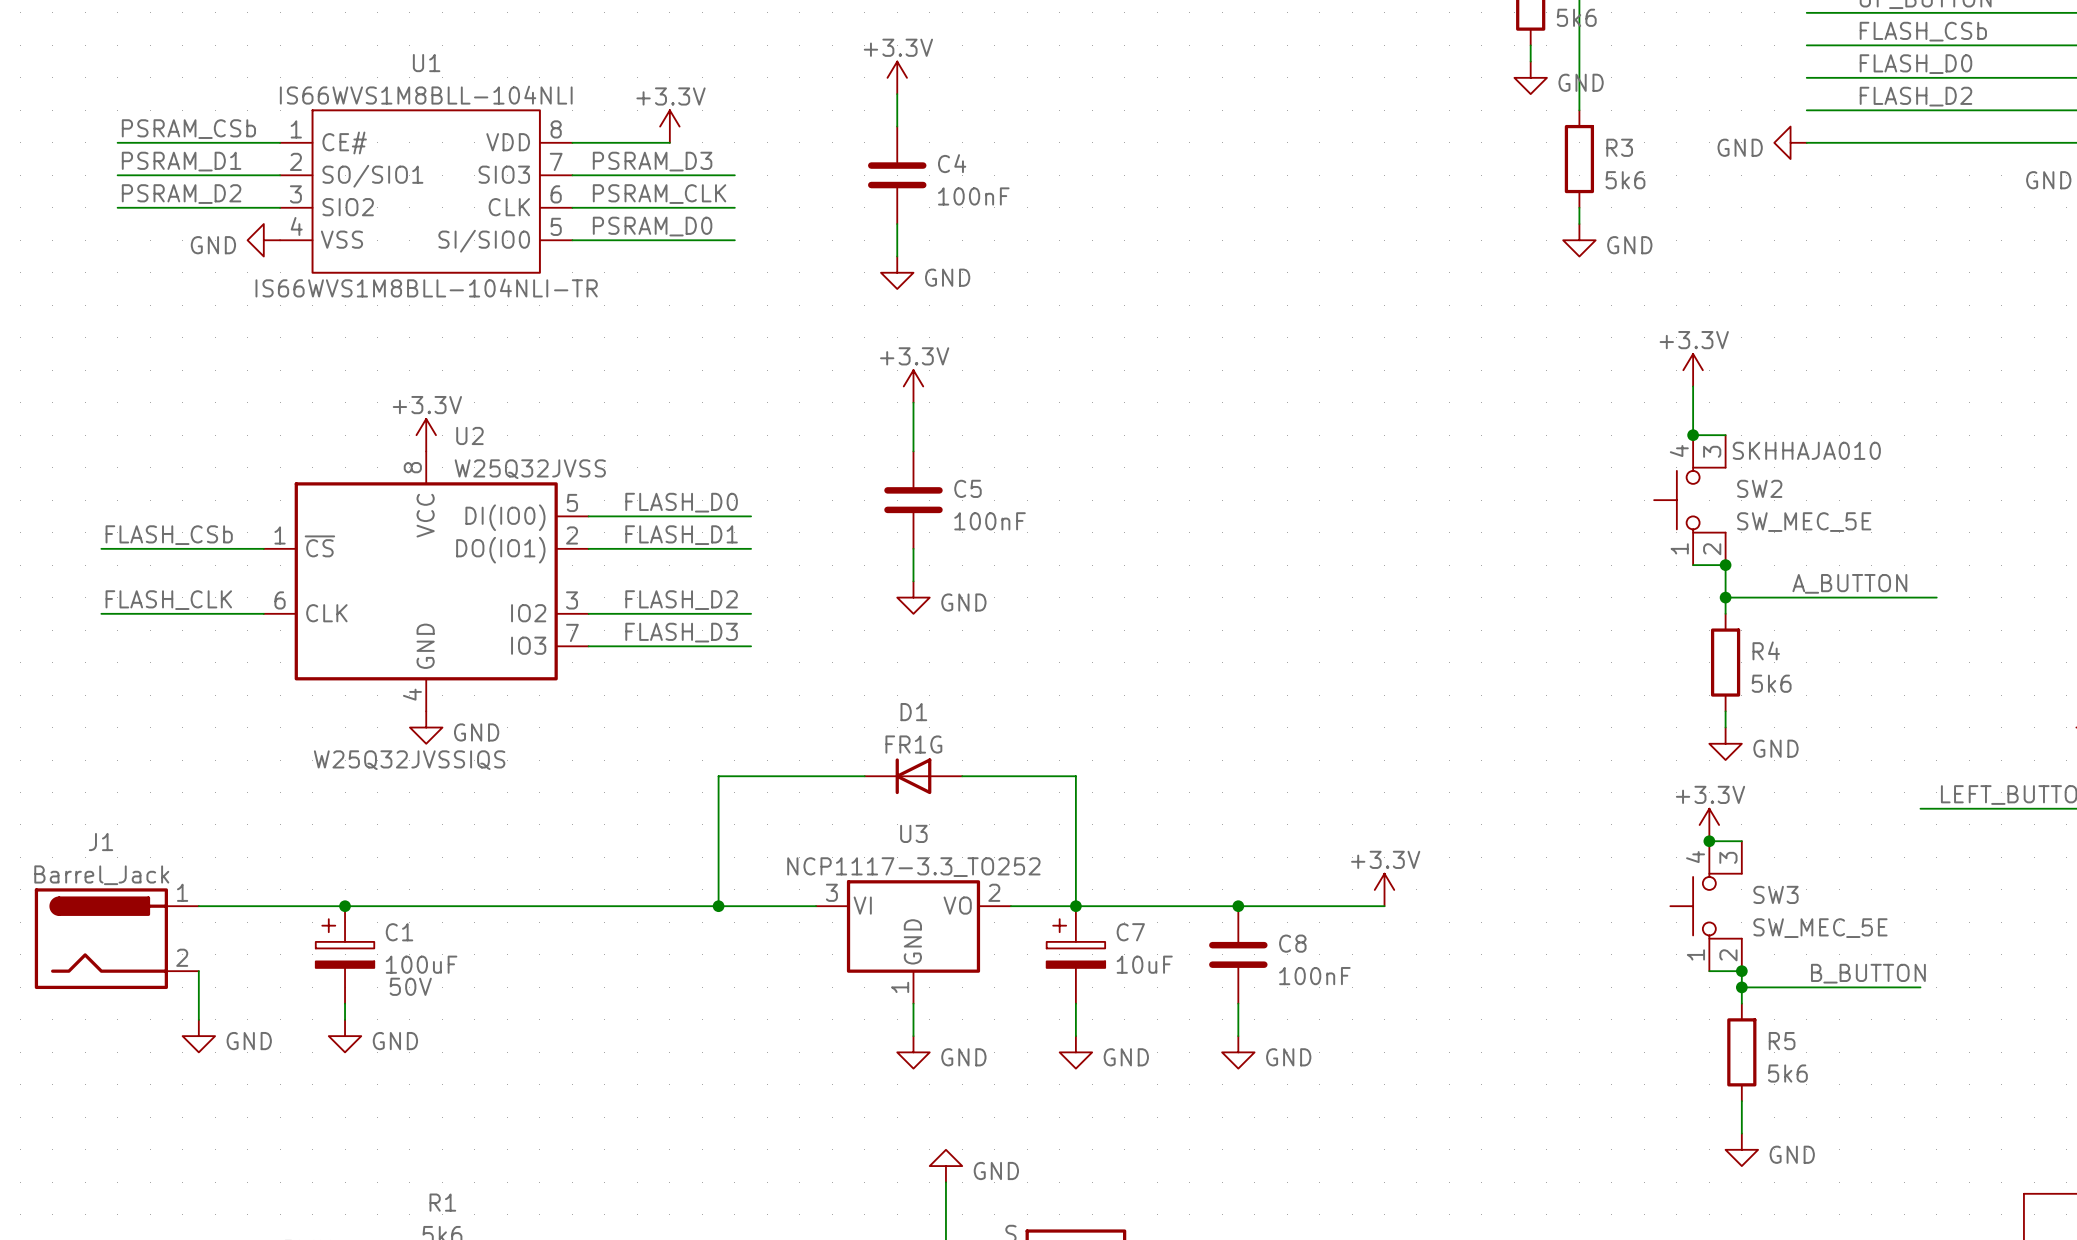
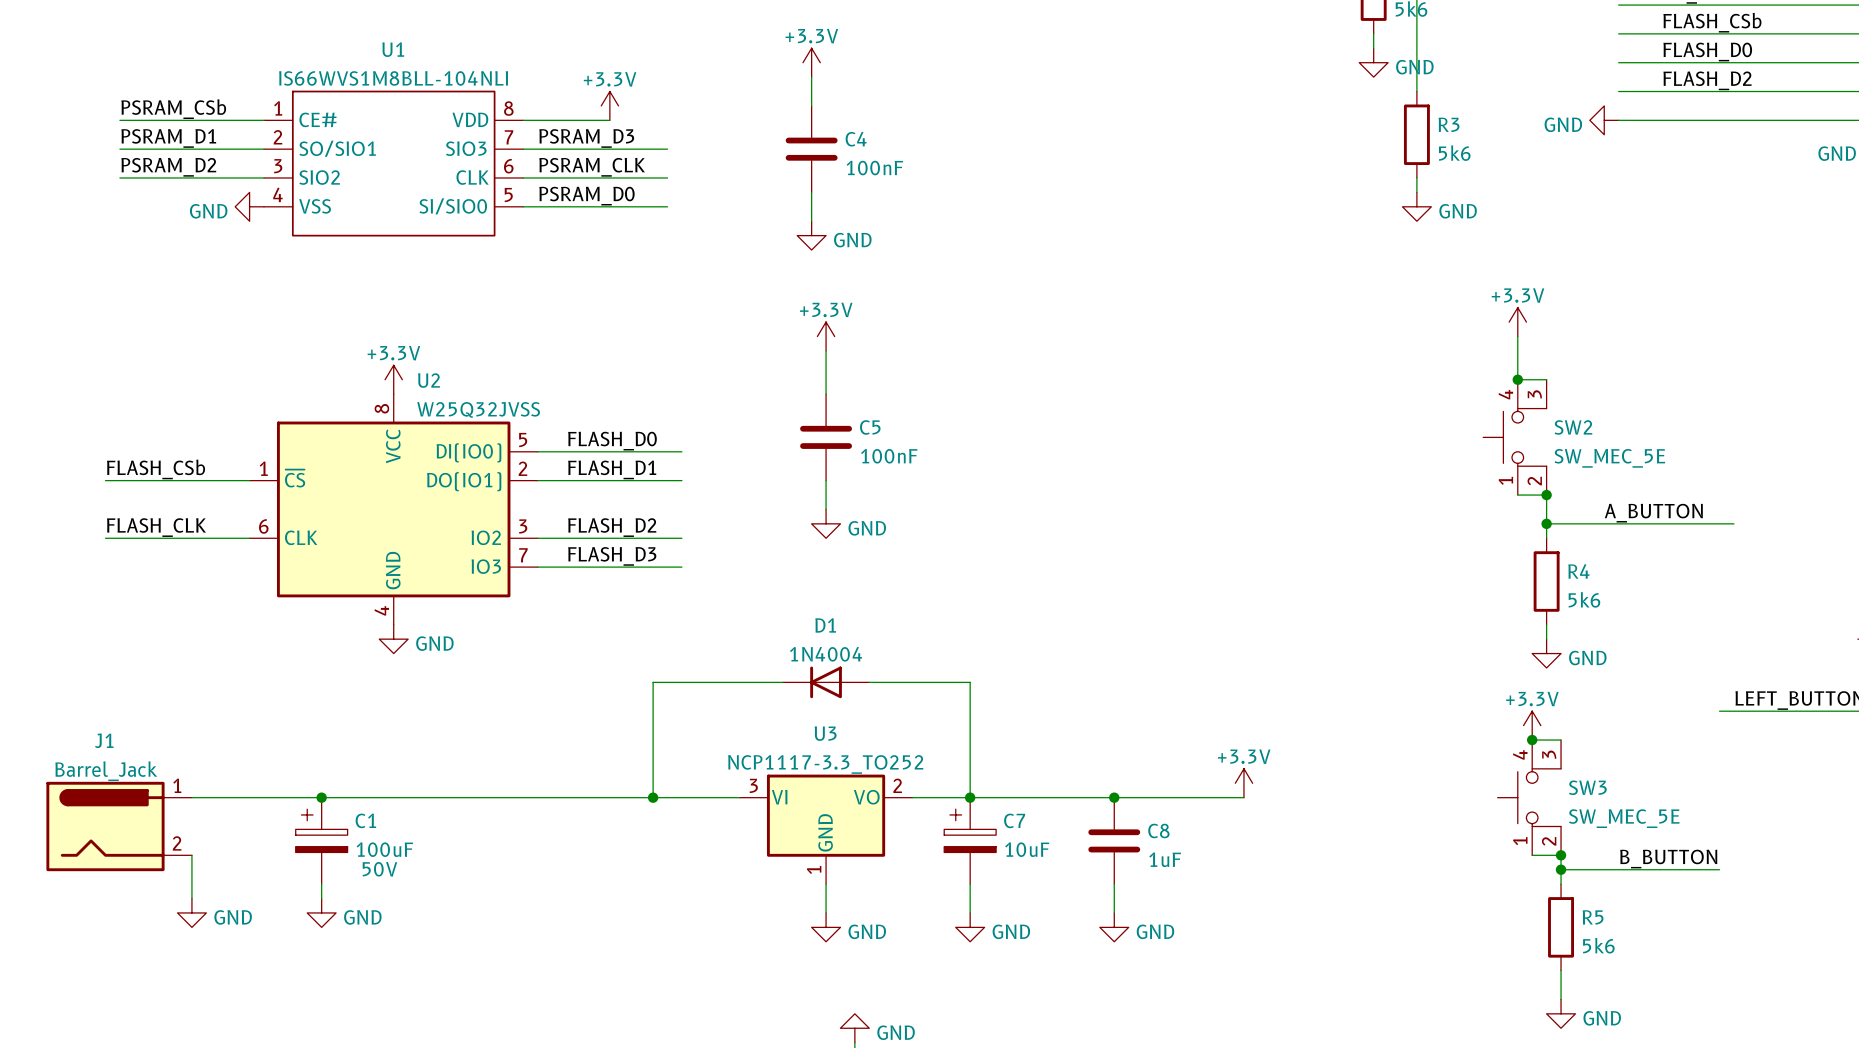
U1 text: IS66WVS1M8BLL-104NLI-TR (426, 288) -> none
SW2 text: SKHHAJA010 (1806, 450) -> none
D1 value: FR1G (913, 744) -> 1N4004 (826, 654)
U2 text: W25Q32JVSSIQS (409, 760) -> none
C8 value: 100nF (1314, 976) -> 1uF (1165, 859)

